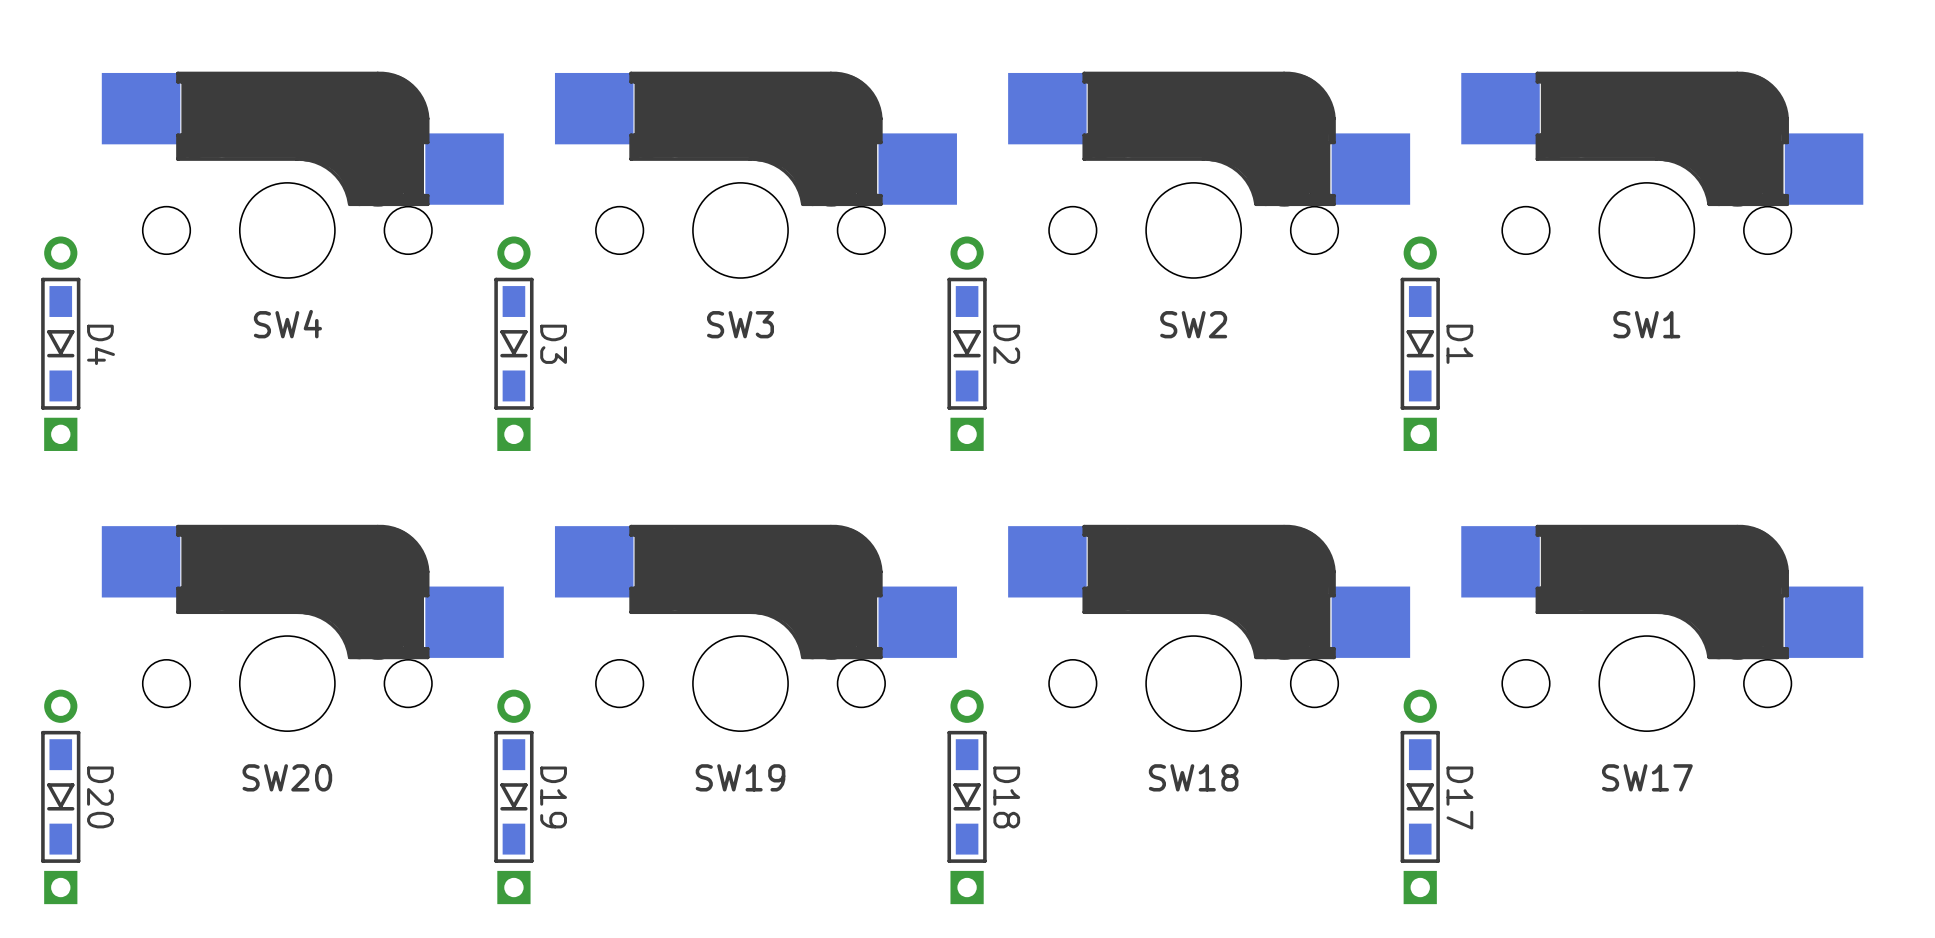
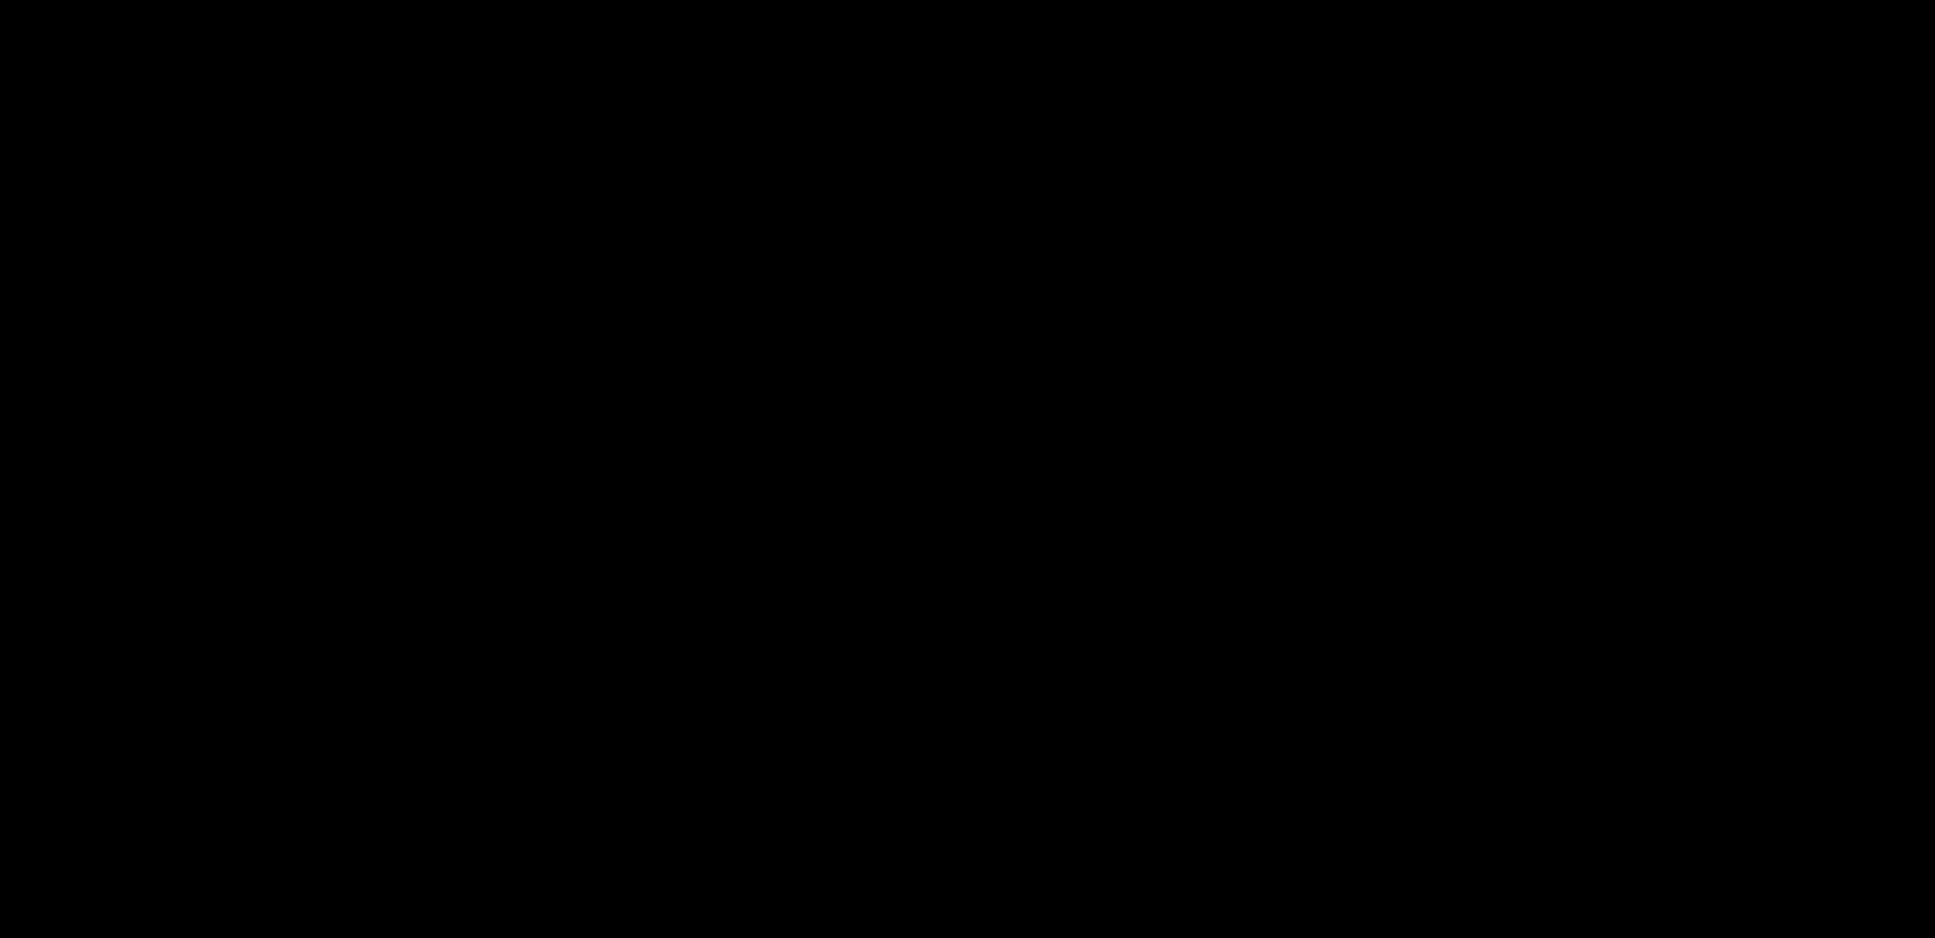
SW4: (302, 174) -> none
SW3: (755, 174) -> none
SW2: (1209, 174) -> none
SW1: (1662, 174) -> none
D4: (60, 343) -> none
D3: (513, 343) -> none
D2: (967, 343) -> none
D1: (1420, 343) -> none
SW20: (302, 627) -> none
SW19: (755, 627) -> none
SW18: (1209, 627) -> none
SW17: (1662, 627) -> none
D20: (60, 796) -> none
D19: (513, 796) -> none
D18: (967, 796) -> none
D17: (1420, 796) -> none

